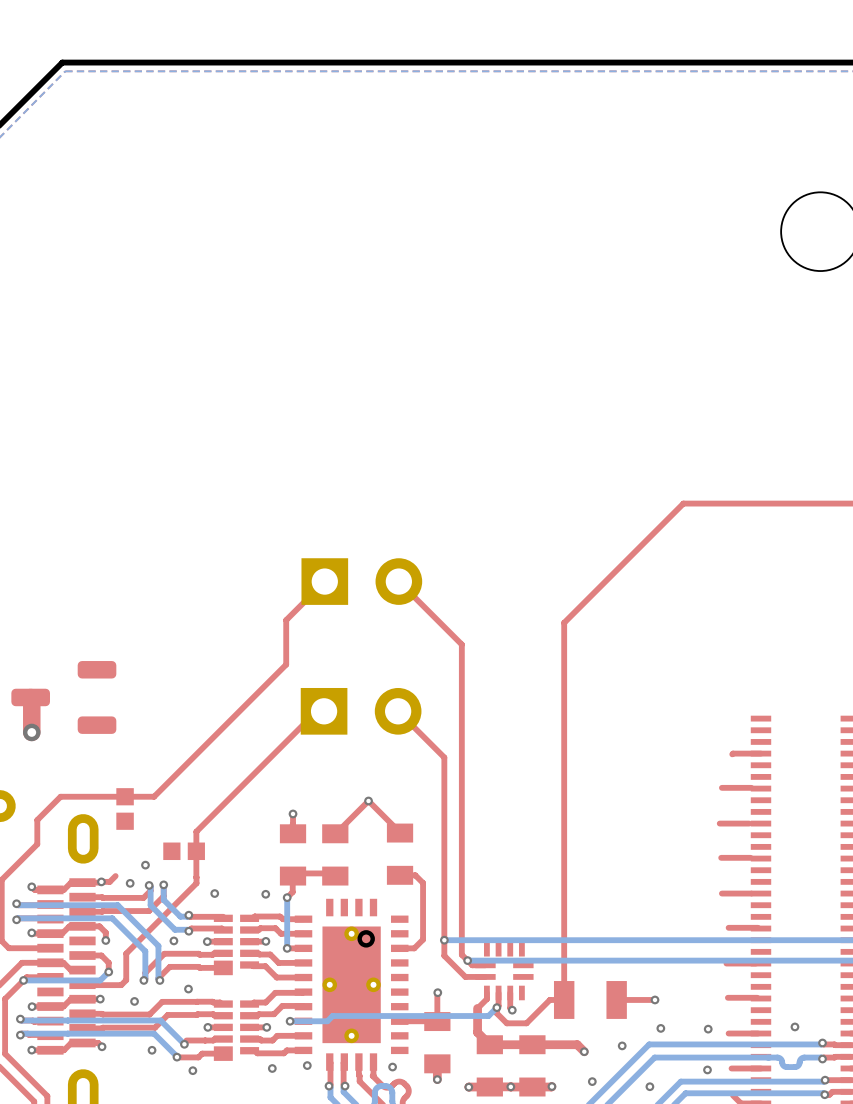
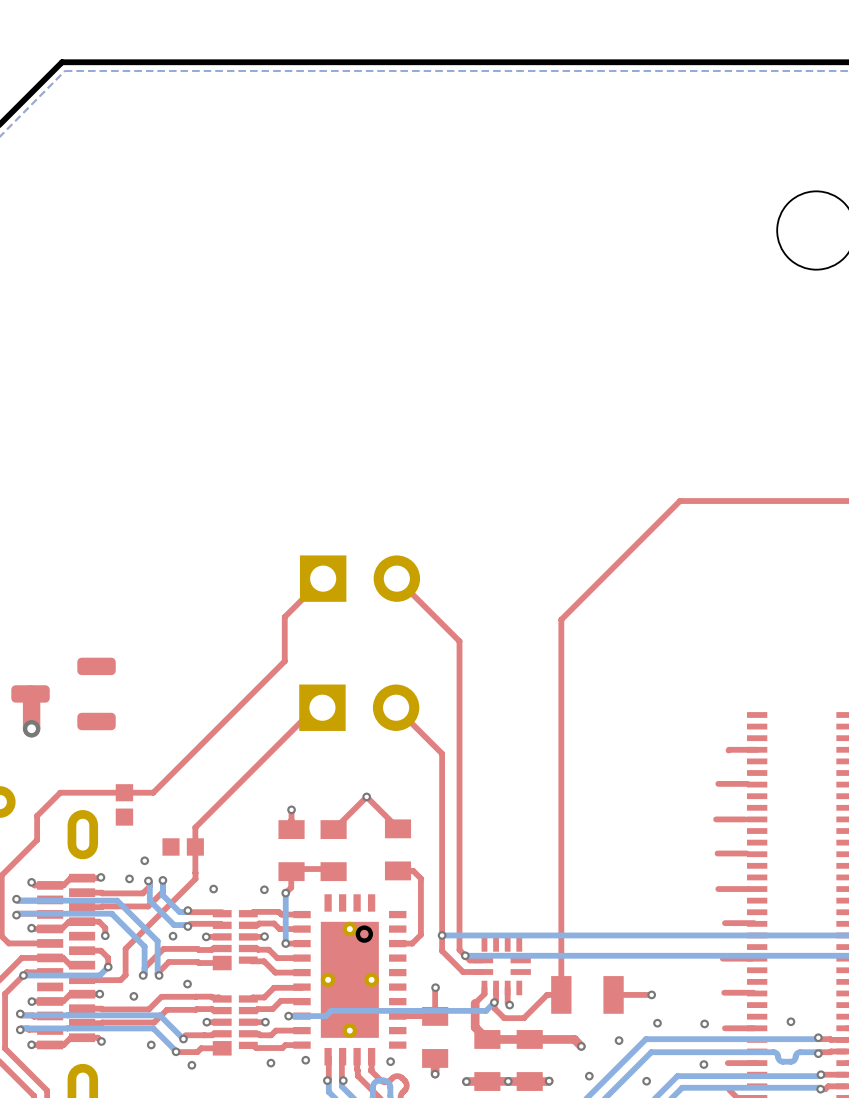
top track: (115, 876) (109, 881) (101, 881) -> none

